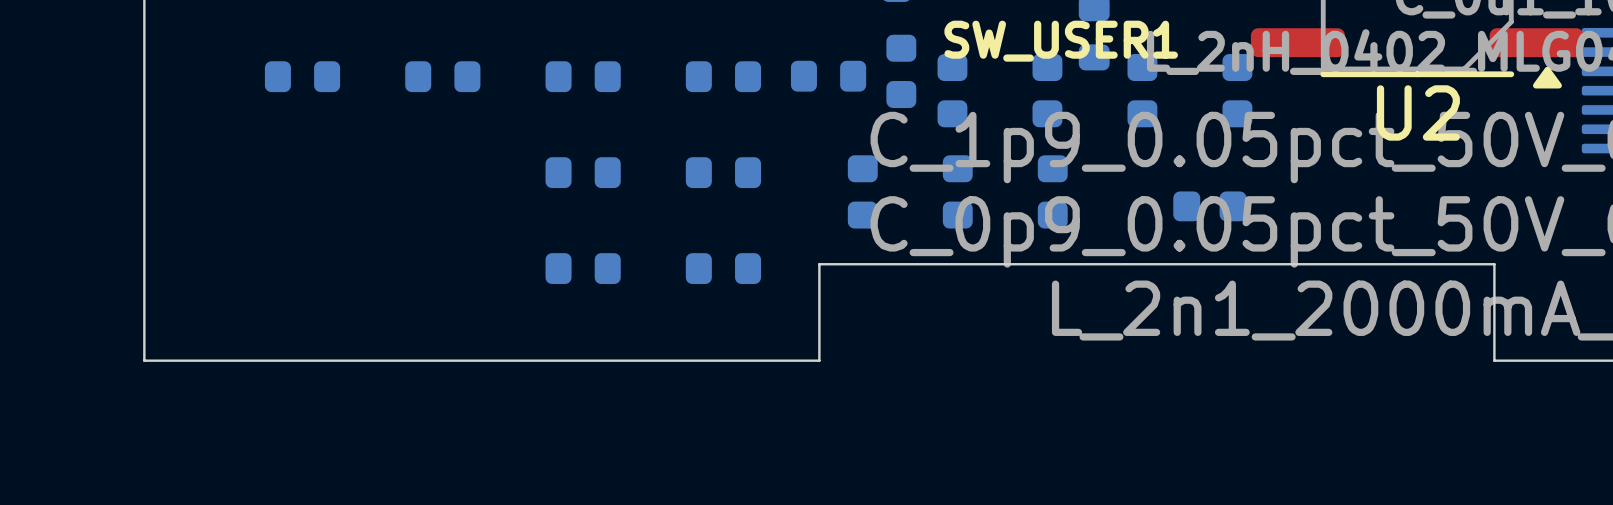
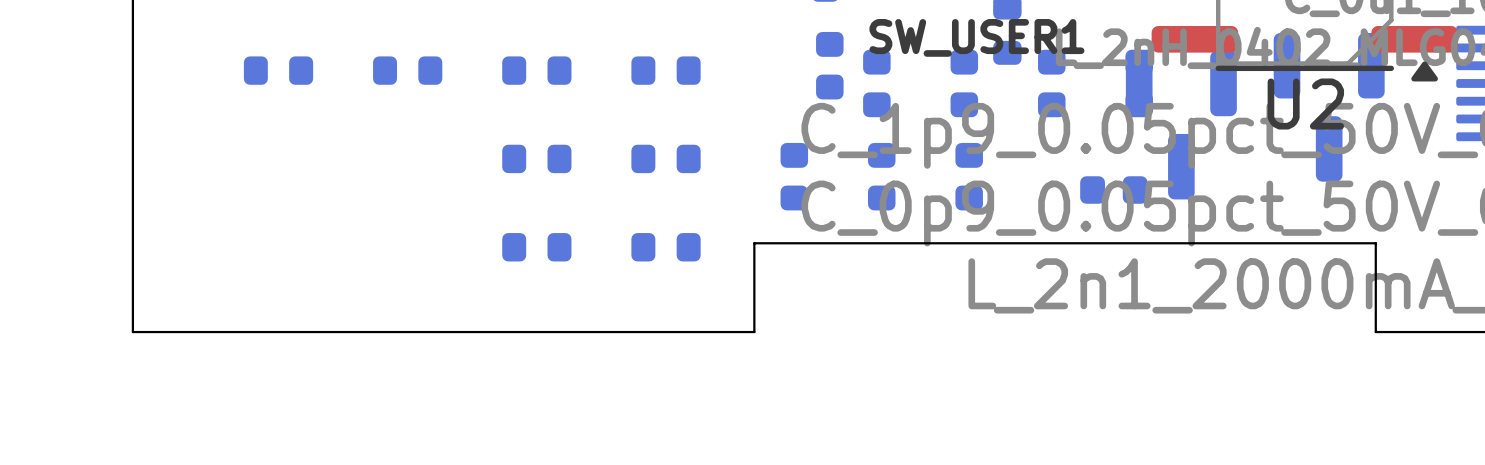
part: (828, 76) -> none
part: none -> (1329, 107)
part: none -> (1181, 125)

